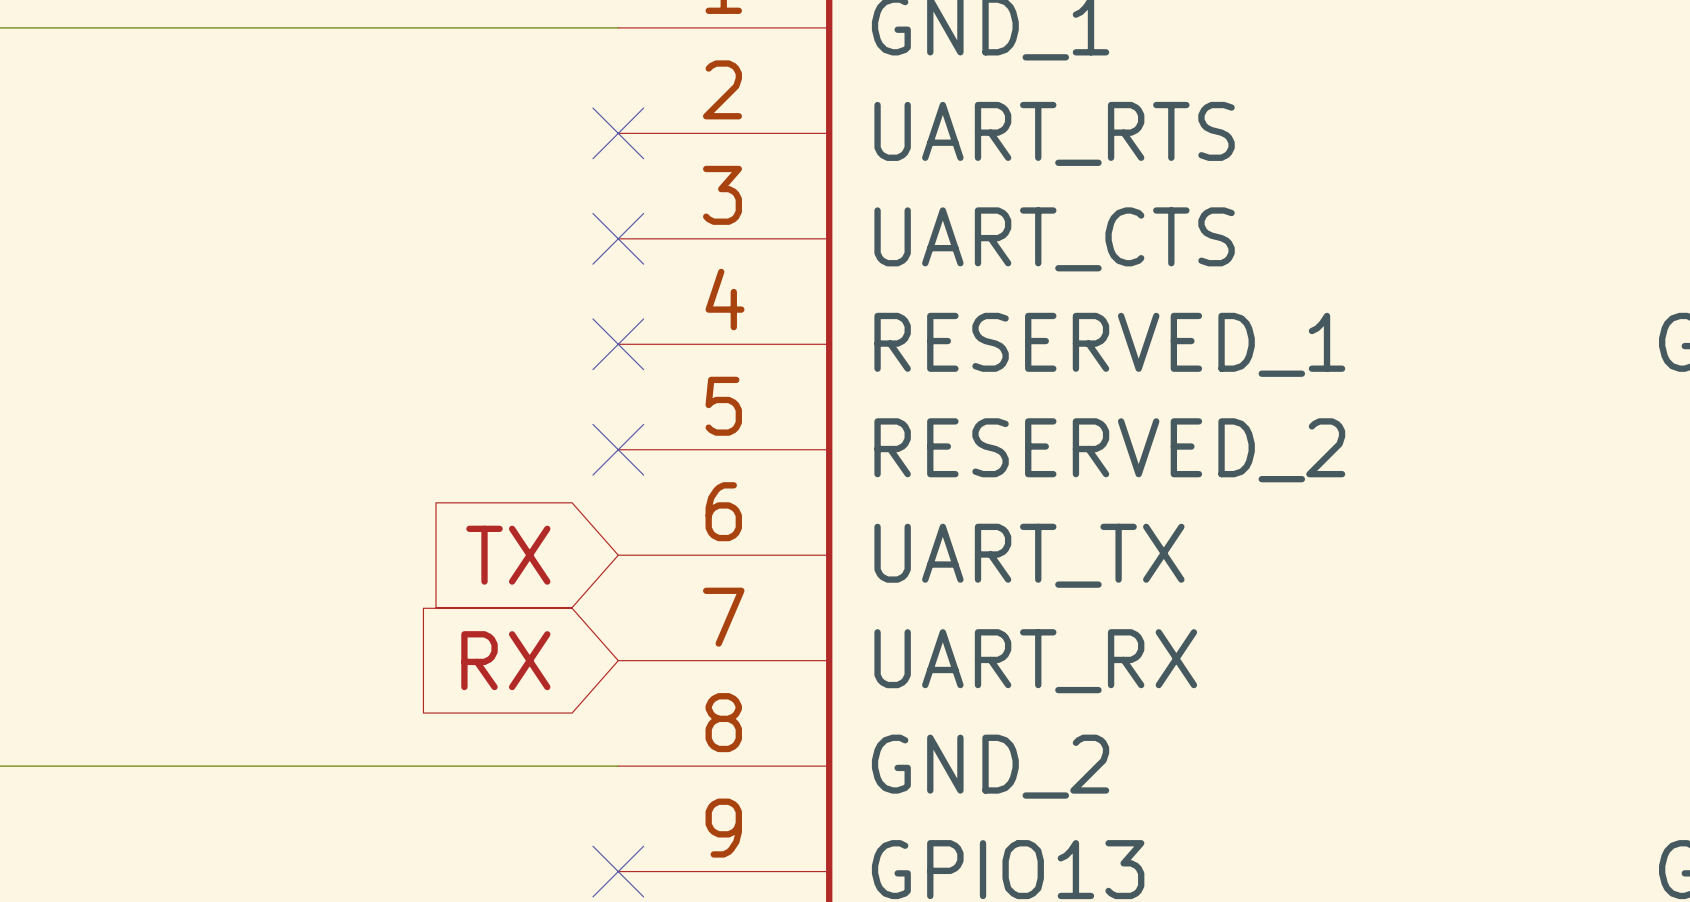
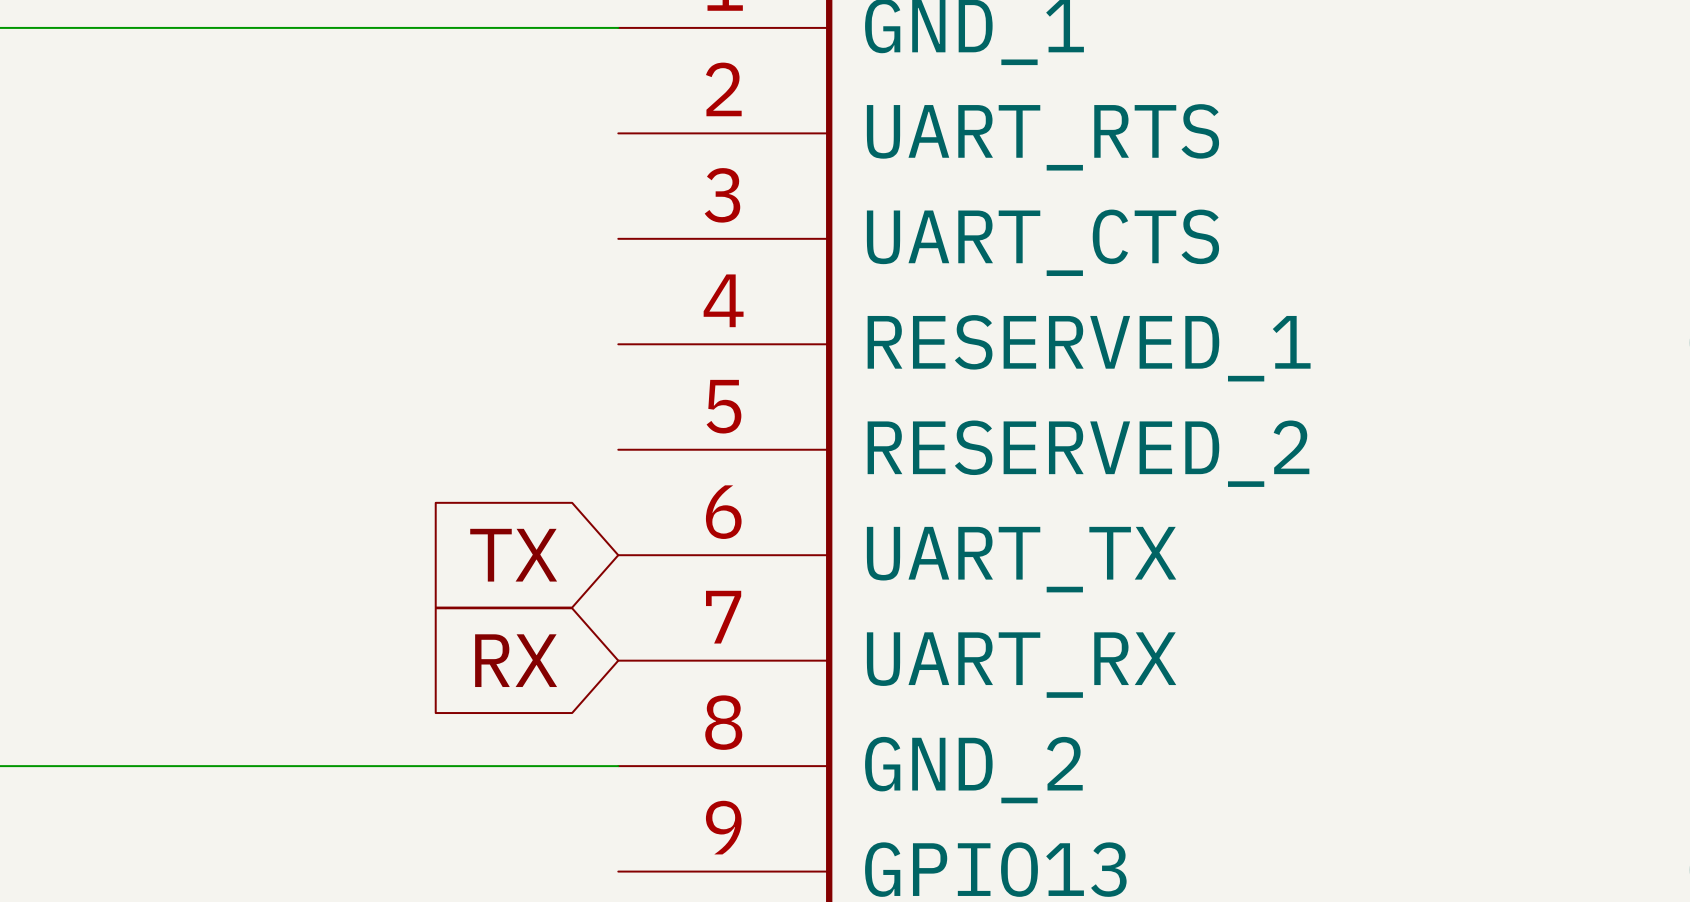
no-connect mark: (618, 133) -> none
no-connect mark: (618, 238) -> none
no-connect mark: (618, 344) -> none
no-connect mark: (618, 449) -> none
no-connect mark: (618, 871) -> none

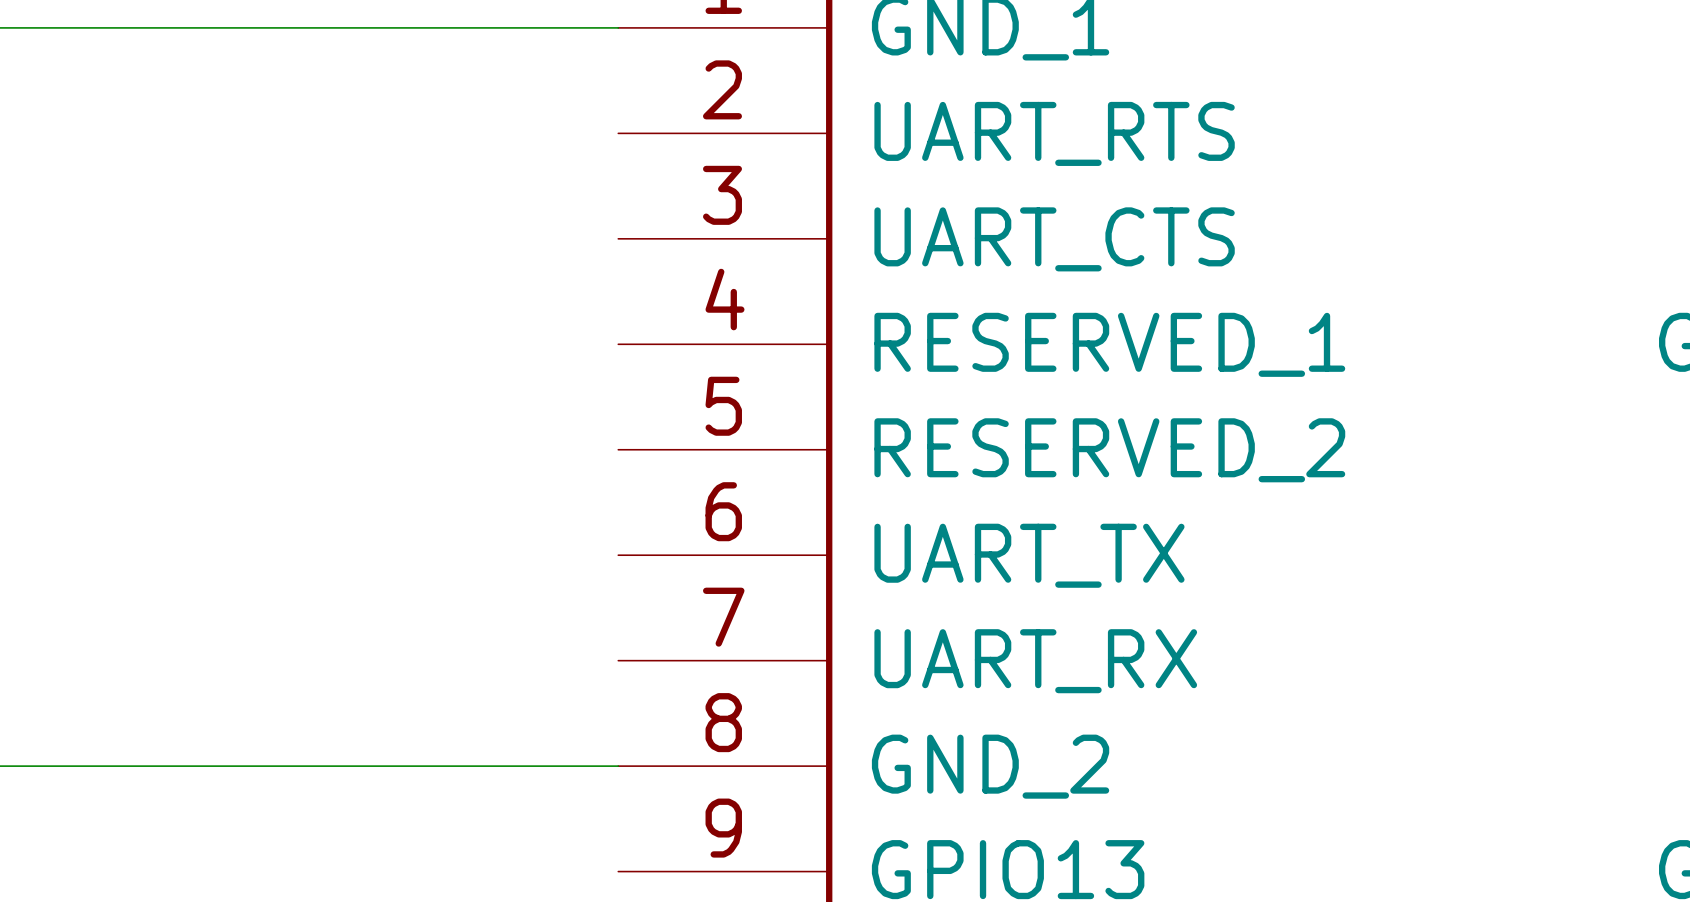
global label: TX (513, 555) -> none
global label: RX (516, 660) -> none

